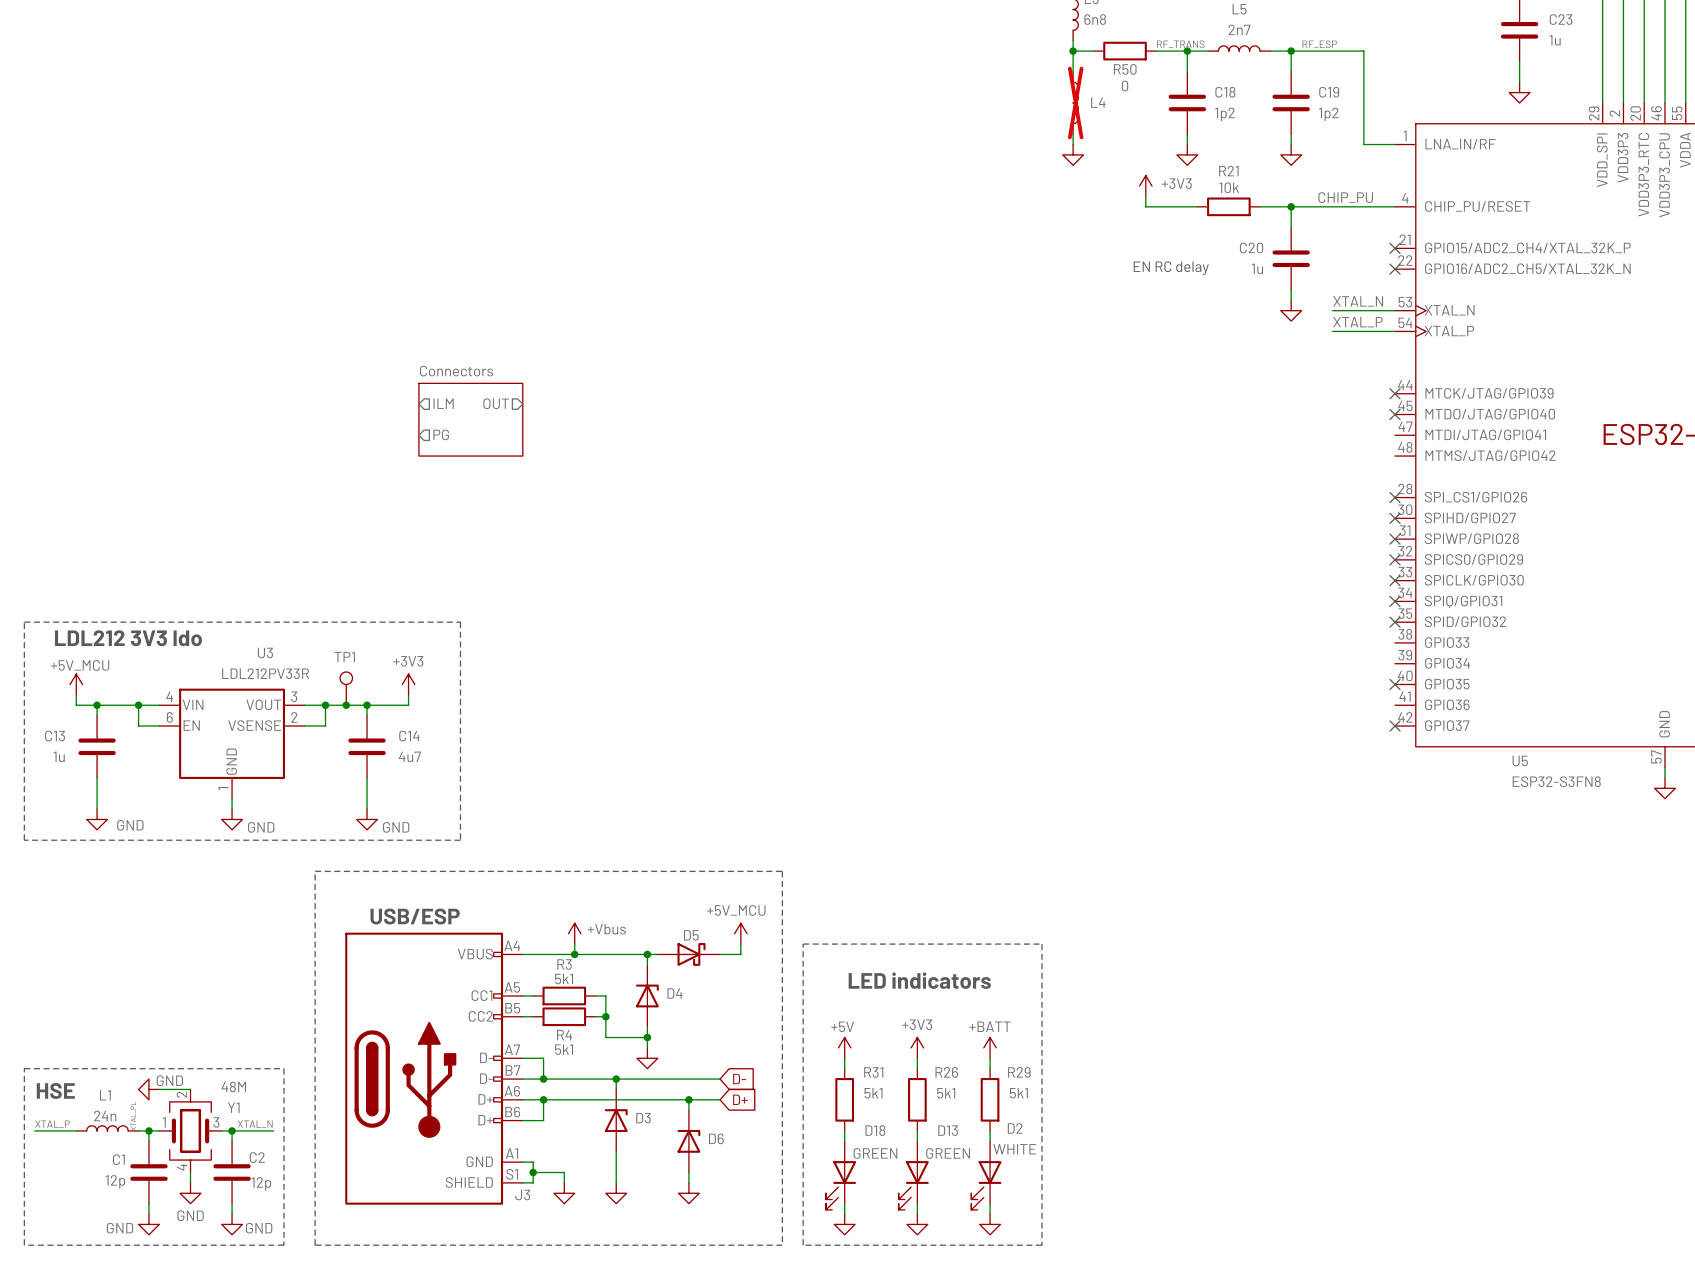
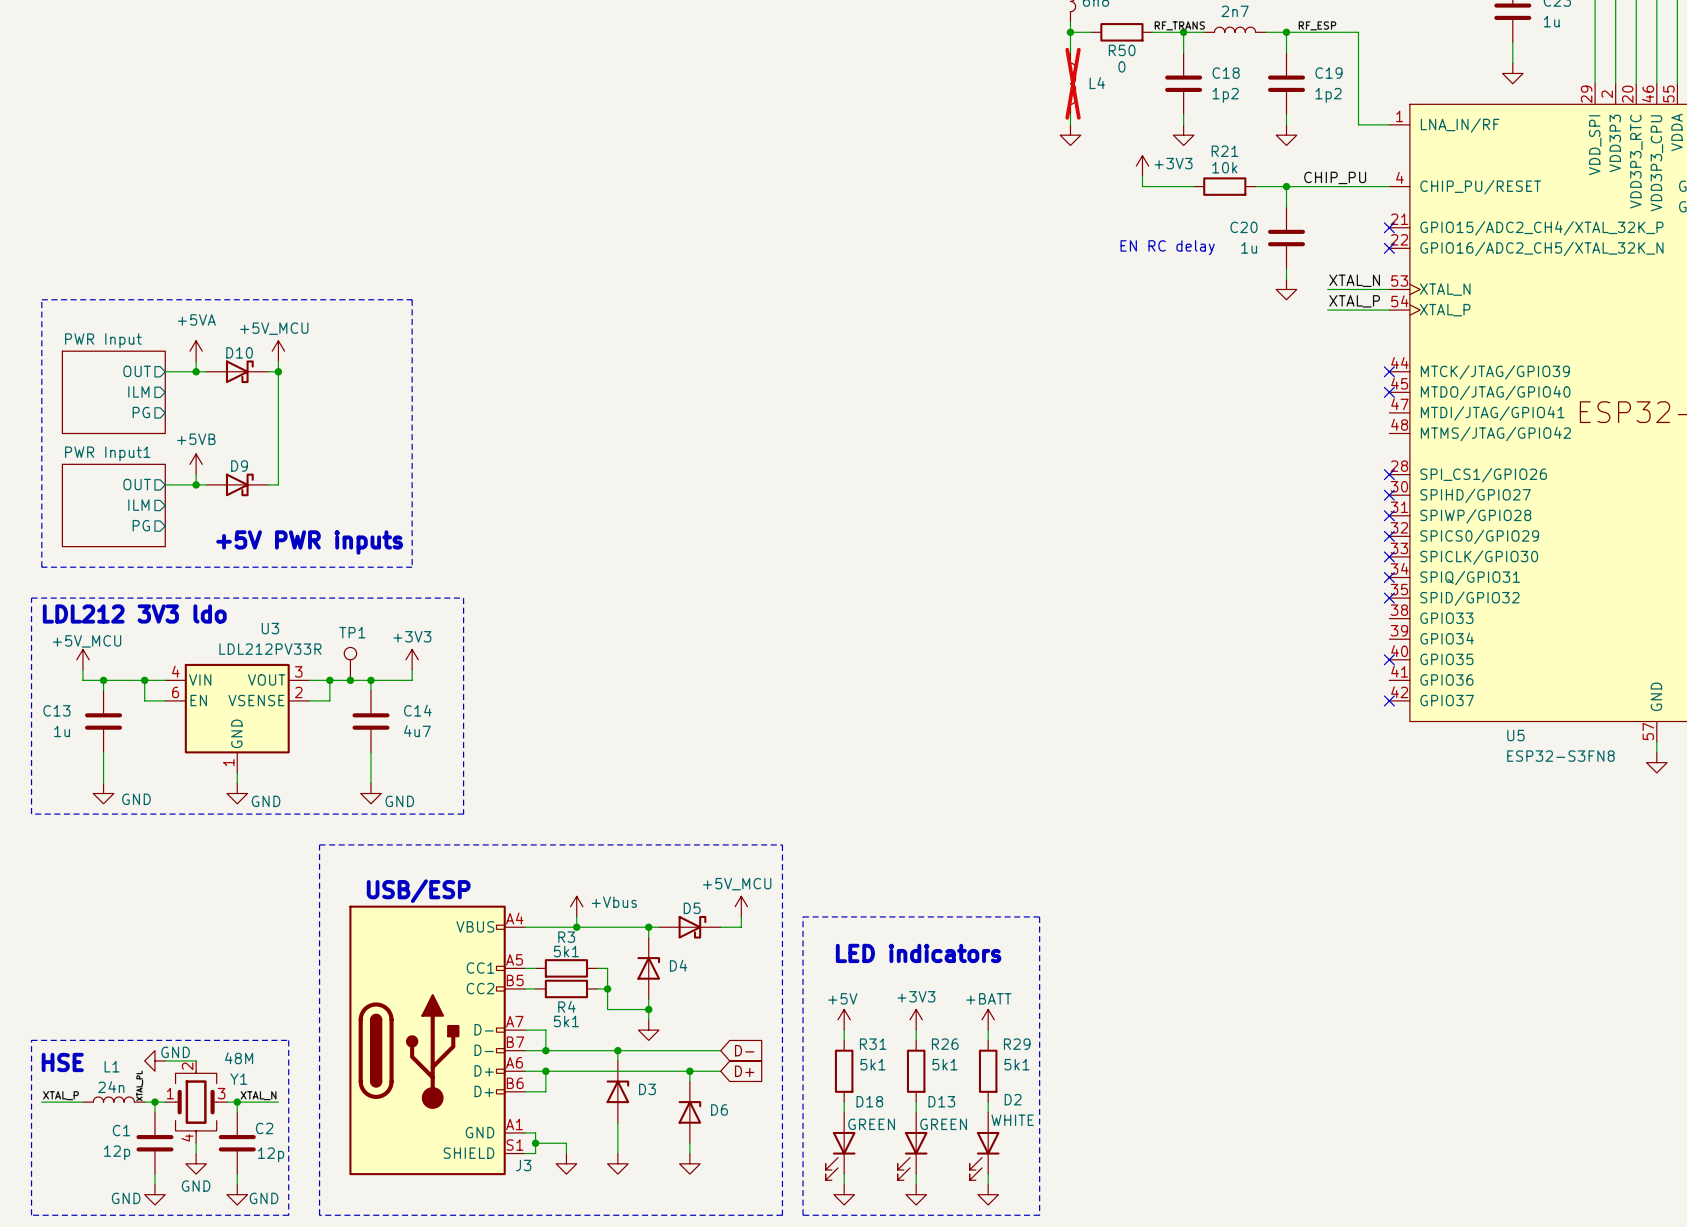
line: none -> (41, 299) (412, 299) (412, 567) (41, 567) (41, 299)
power symbol: none -> +5VA (196, 351)
power symbol: none -> +5V_MCU (278, 351)
wire: none -> (196, 361) (196, 371)
wire: none -> (278, 361) (278, 484) (268, 484)
sheet pin: none -> OUT (137, 371)
wire: none -> (165, 371) (206, 371)
junction: none -> (196, 371)
D10: none -> (237, 371)
wire: none -> (268, 371) (278, 371)
junction: none -> (278, 371)
sheet pin: ILM (443, 403) -> none
sheet pin: OUT (496, 403) -> none
sheet PWR Input: none -> (113, 392)
sheet pin: none -> ILM (138, 391)
sheet Connectors: (470, 419) -> none
sheet pin: none -> PG (141, 412)
sheet pin: PG (441, 434) -> none
power symbol: none -> +5VB (196, 464)
wire: none -> (196, 474) (196, 484)
sheet pin: none -> OUT (137, 484)
wire: none -> (165, 484) (206, 484)
junction: none -> (196, 484)
D9: none -> (237, 484)
sheet PWR Input1: none -> (113, 505)
sheet pin: none -> ILM (138, 505)
sheet pin: none -> PG (141, 525)
text: none -> +5V PWR inputs (309, 542)

